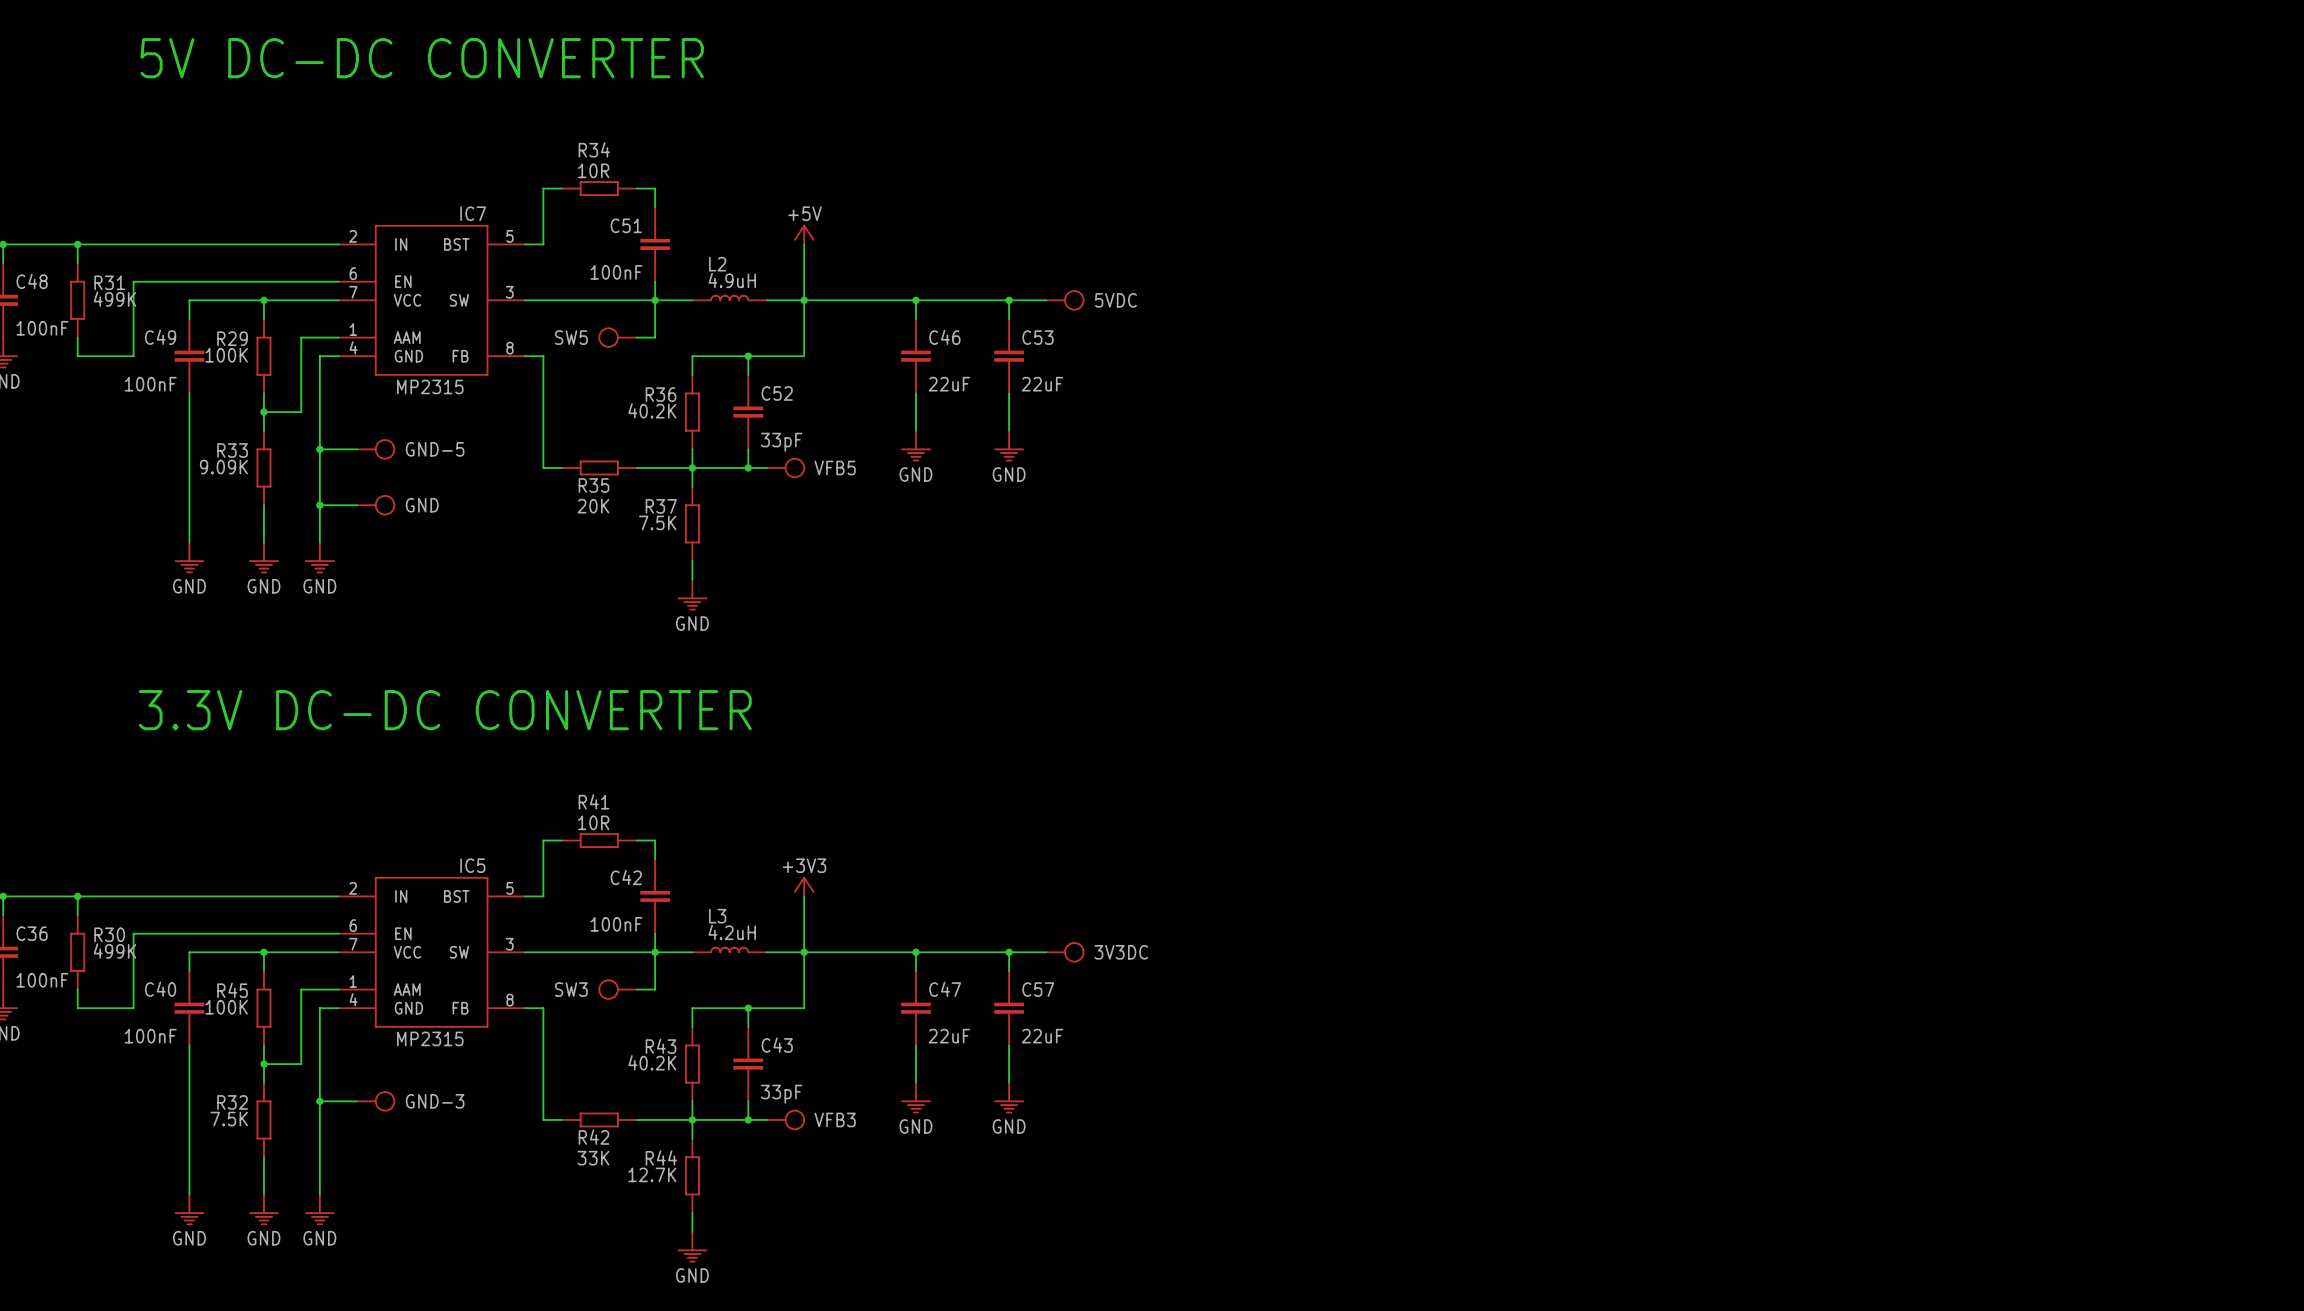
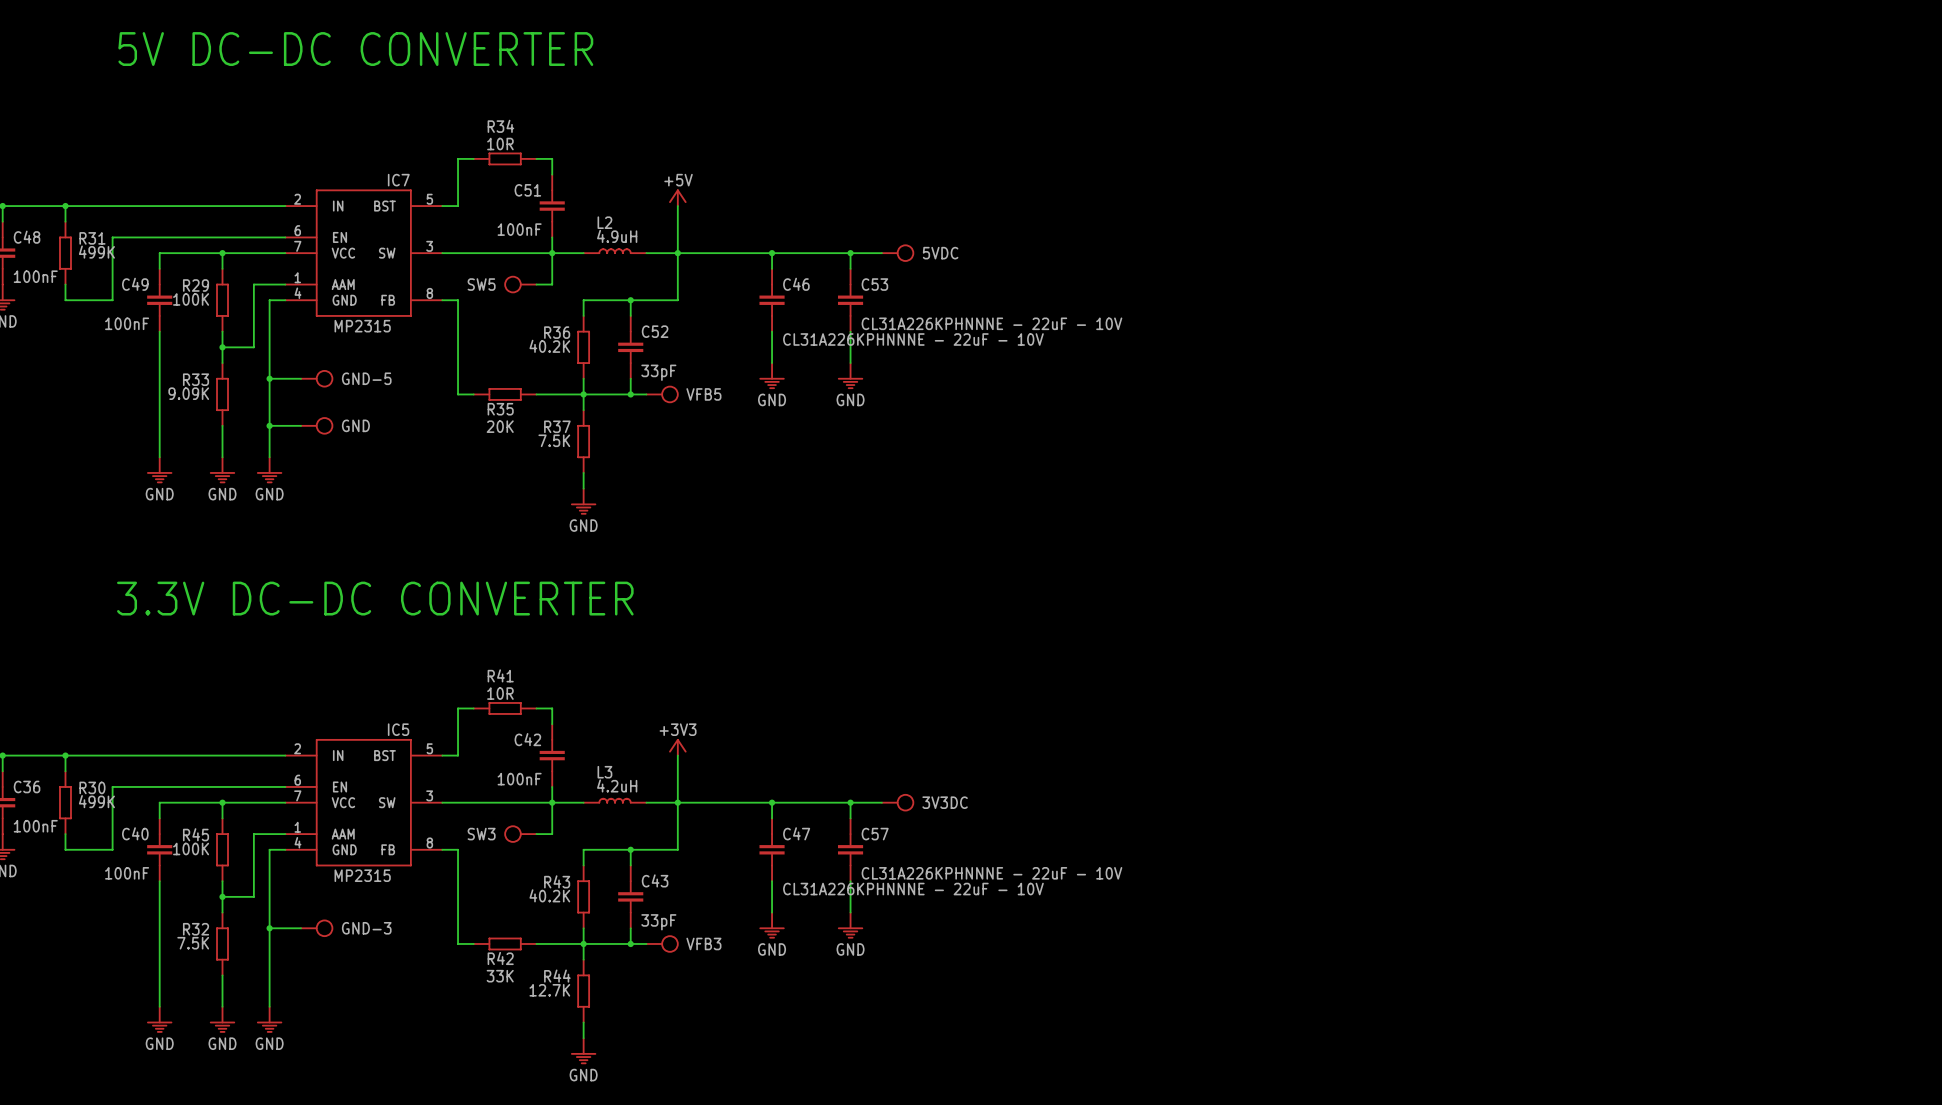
C46 value: 22uF (949, 384) -> CL31A226KPHNNNE - 22uF - 10V (913, 339)
C53 value: 22uF (1042, 384) -> CL31A226KPHNNNE - 22uF - 10V (991, 323)
C47 value: 22uF (949, 1036) -> CL31A226KPHNNNE - 22uF - 10V (913, 889)
C57 value: 22uF (1042, 1036) -> CL31A226KPHNNNE - 22uF - 10V (991, 873)

